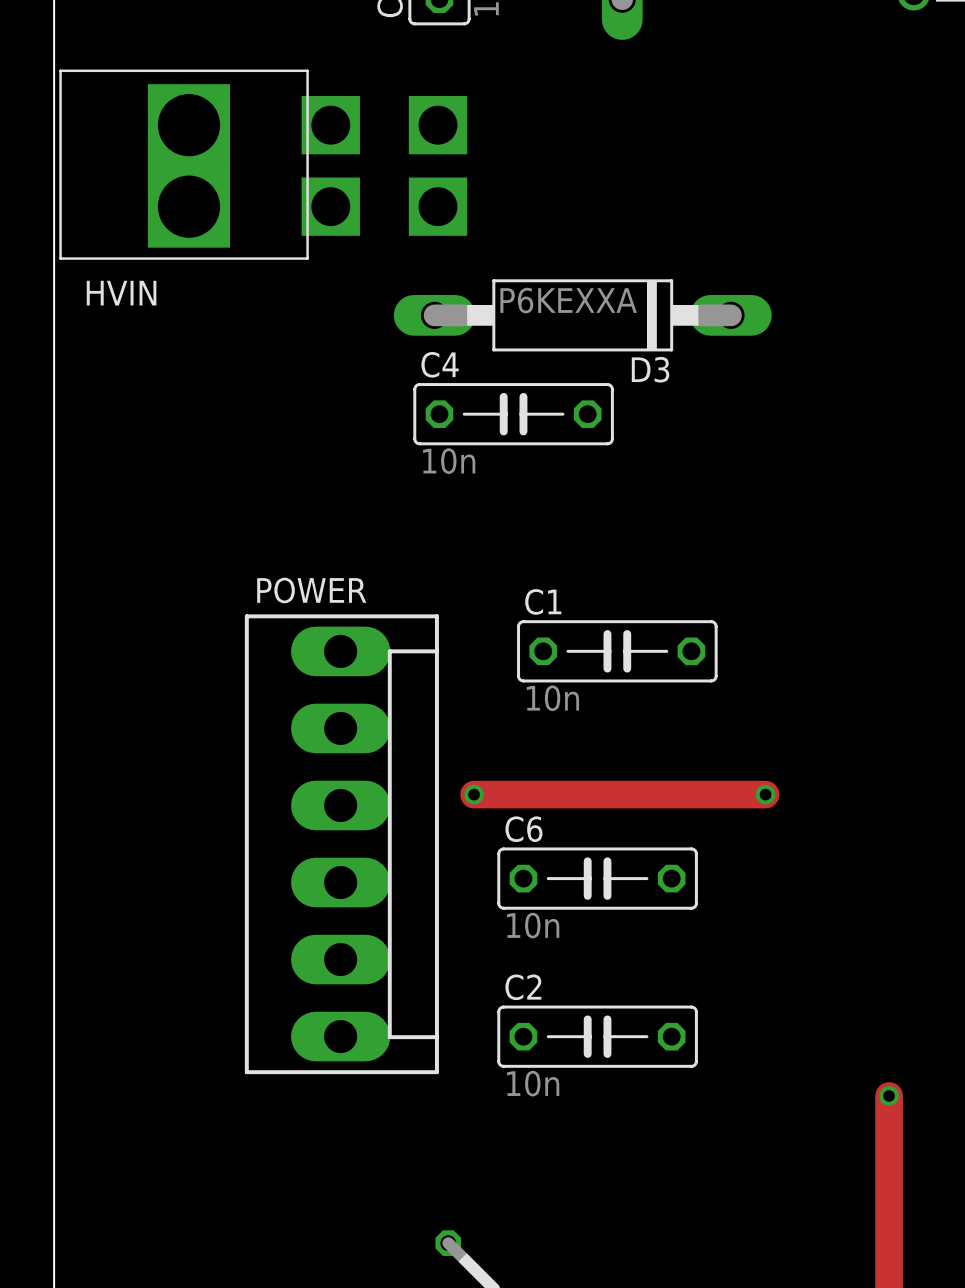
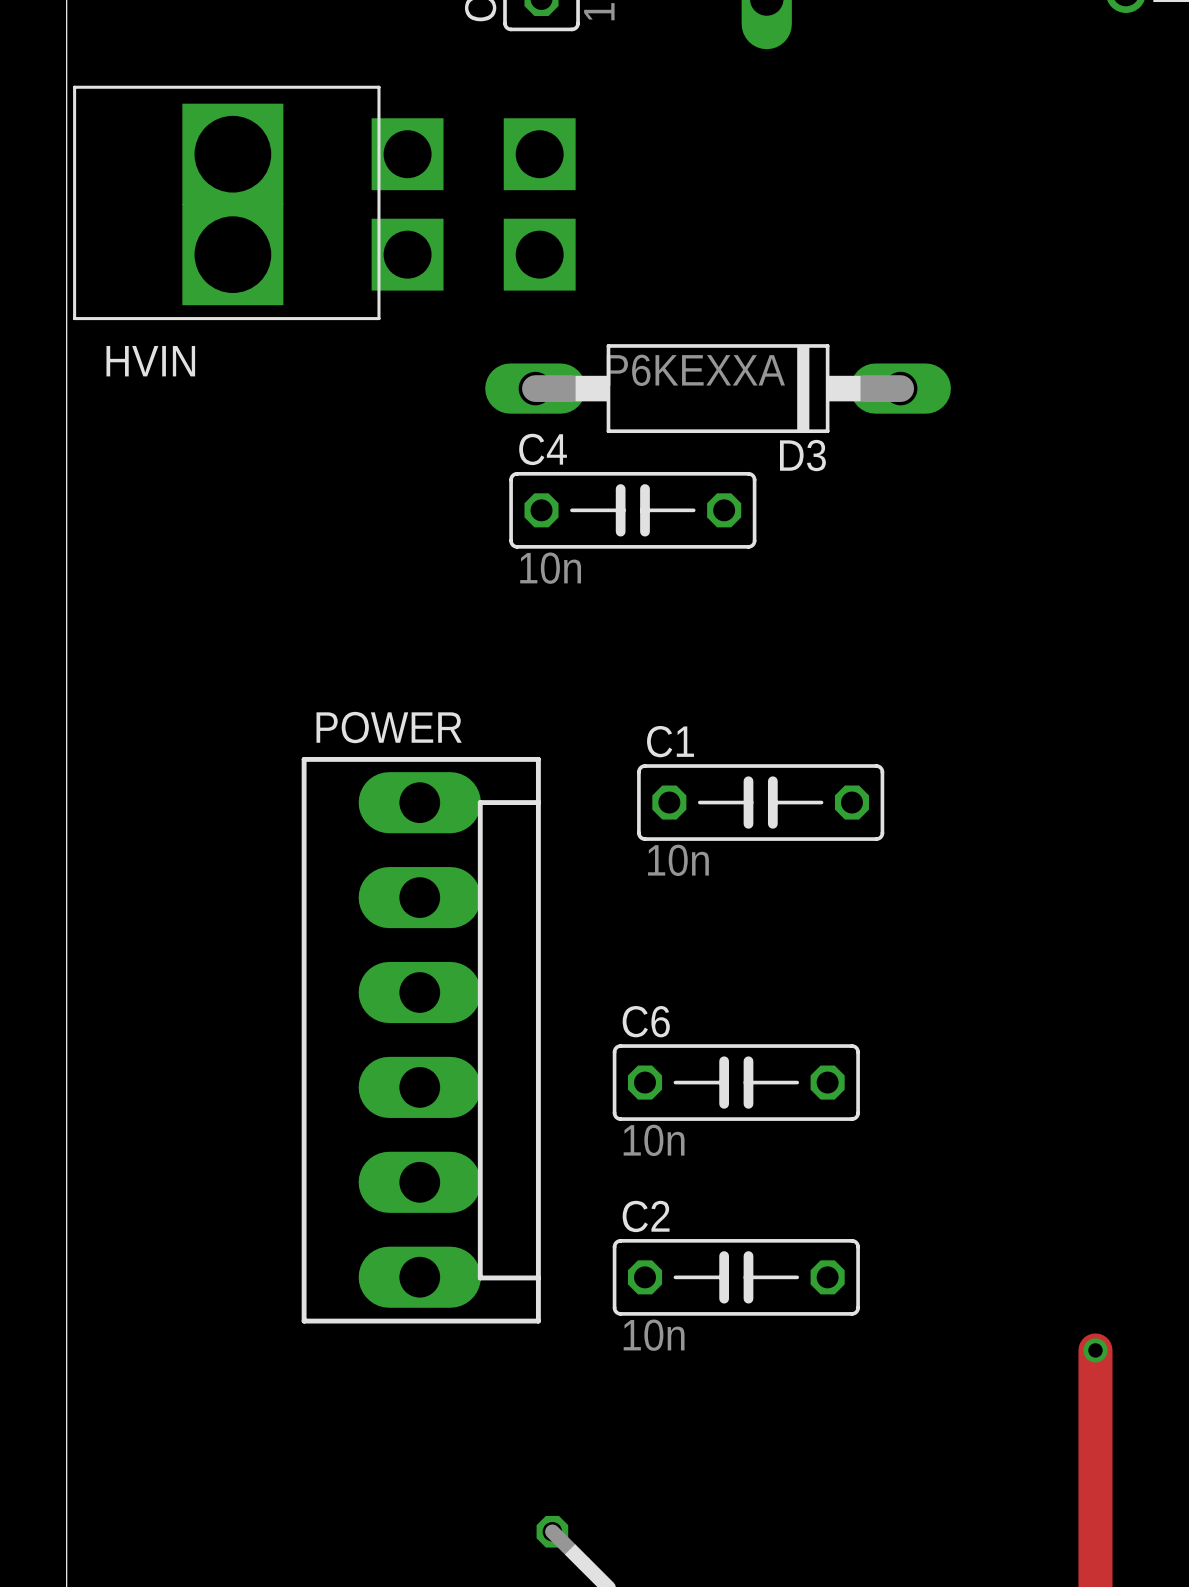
track: (474, 794) (765, 794) -> none
via: (474, 794) -> none
via: (765, 794) -> none

